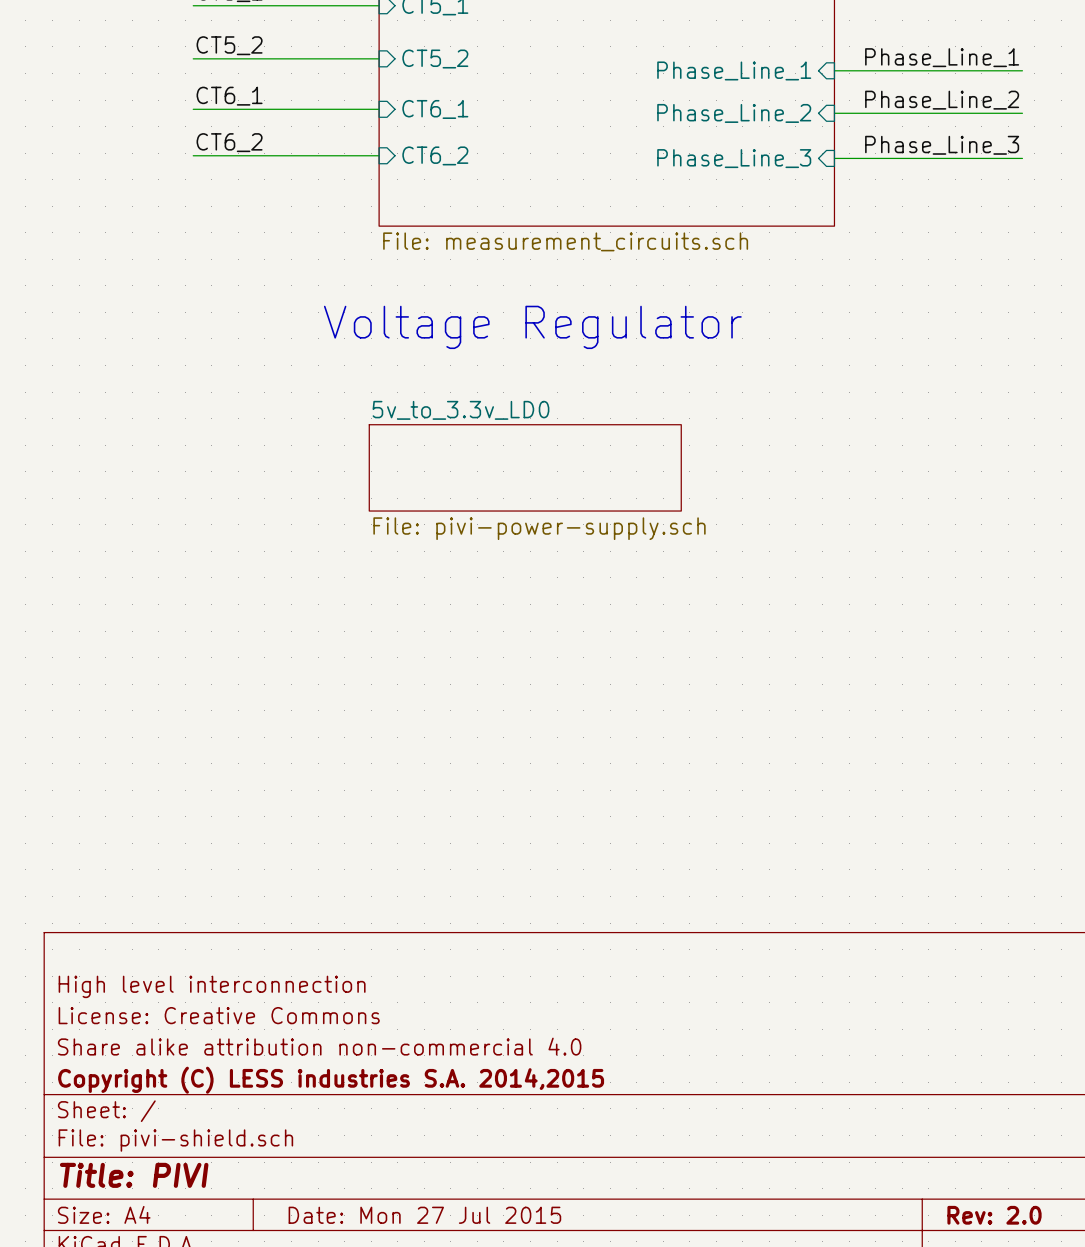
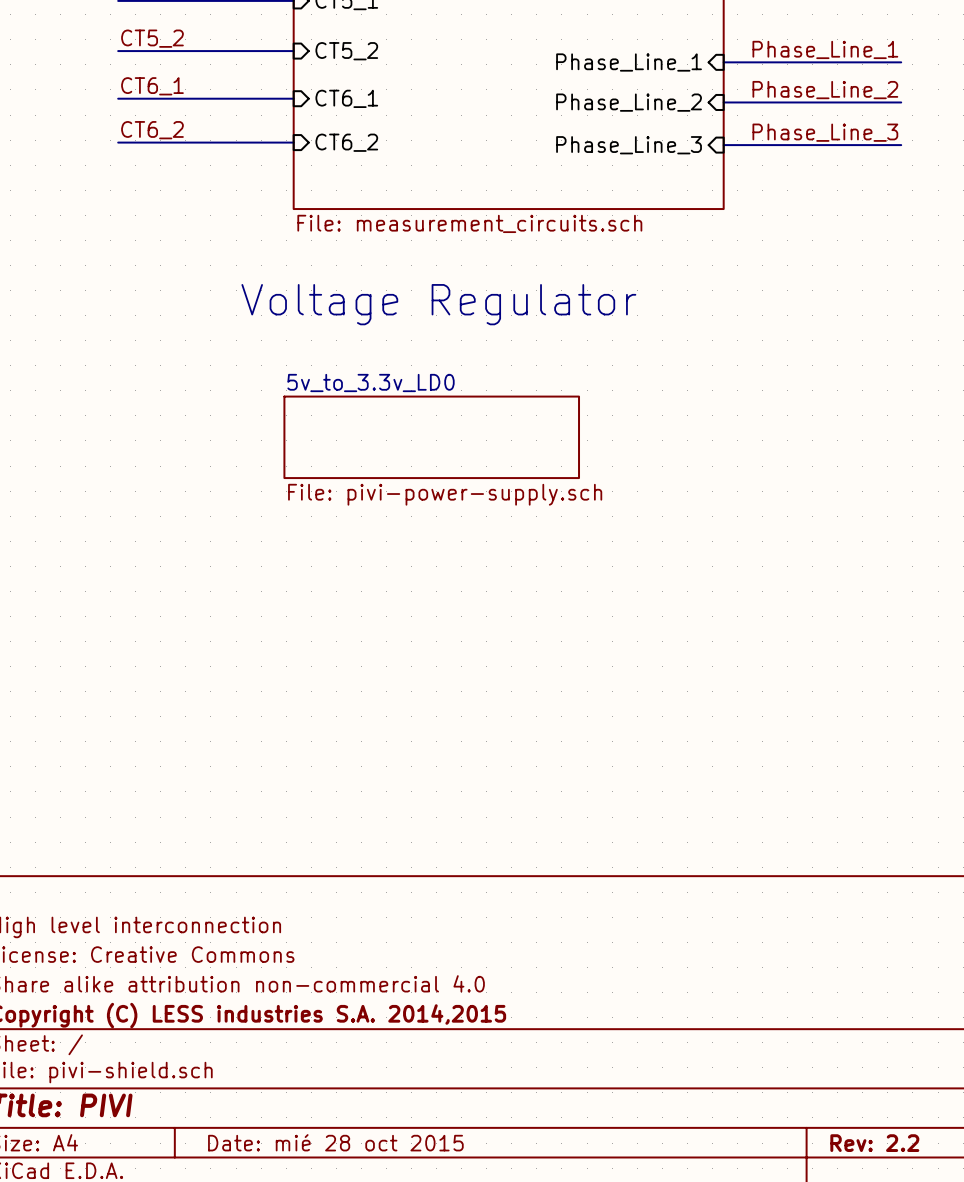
title block: Date: Mon 27 Jul 2015 (424, 1215) -> Date: mié 28 oct 2015 (335, 1142)
title block: Rev: 2.0 (994, 1215) -> Rev: 2.2 (874, 1143)

